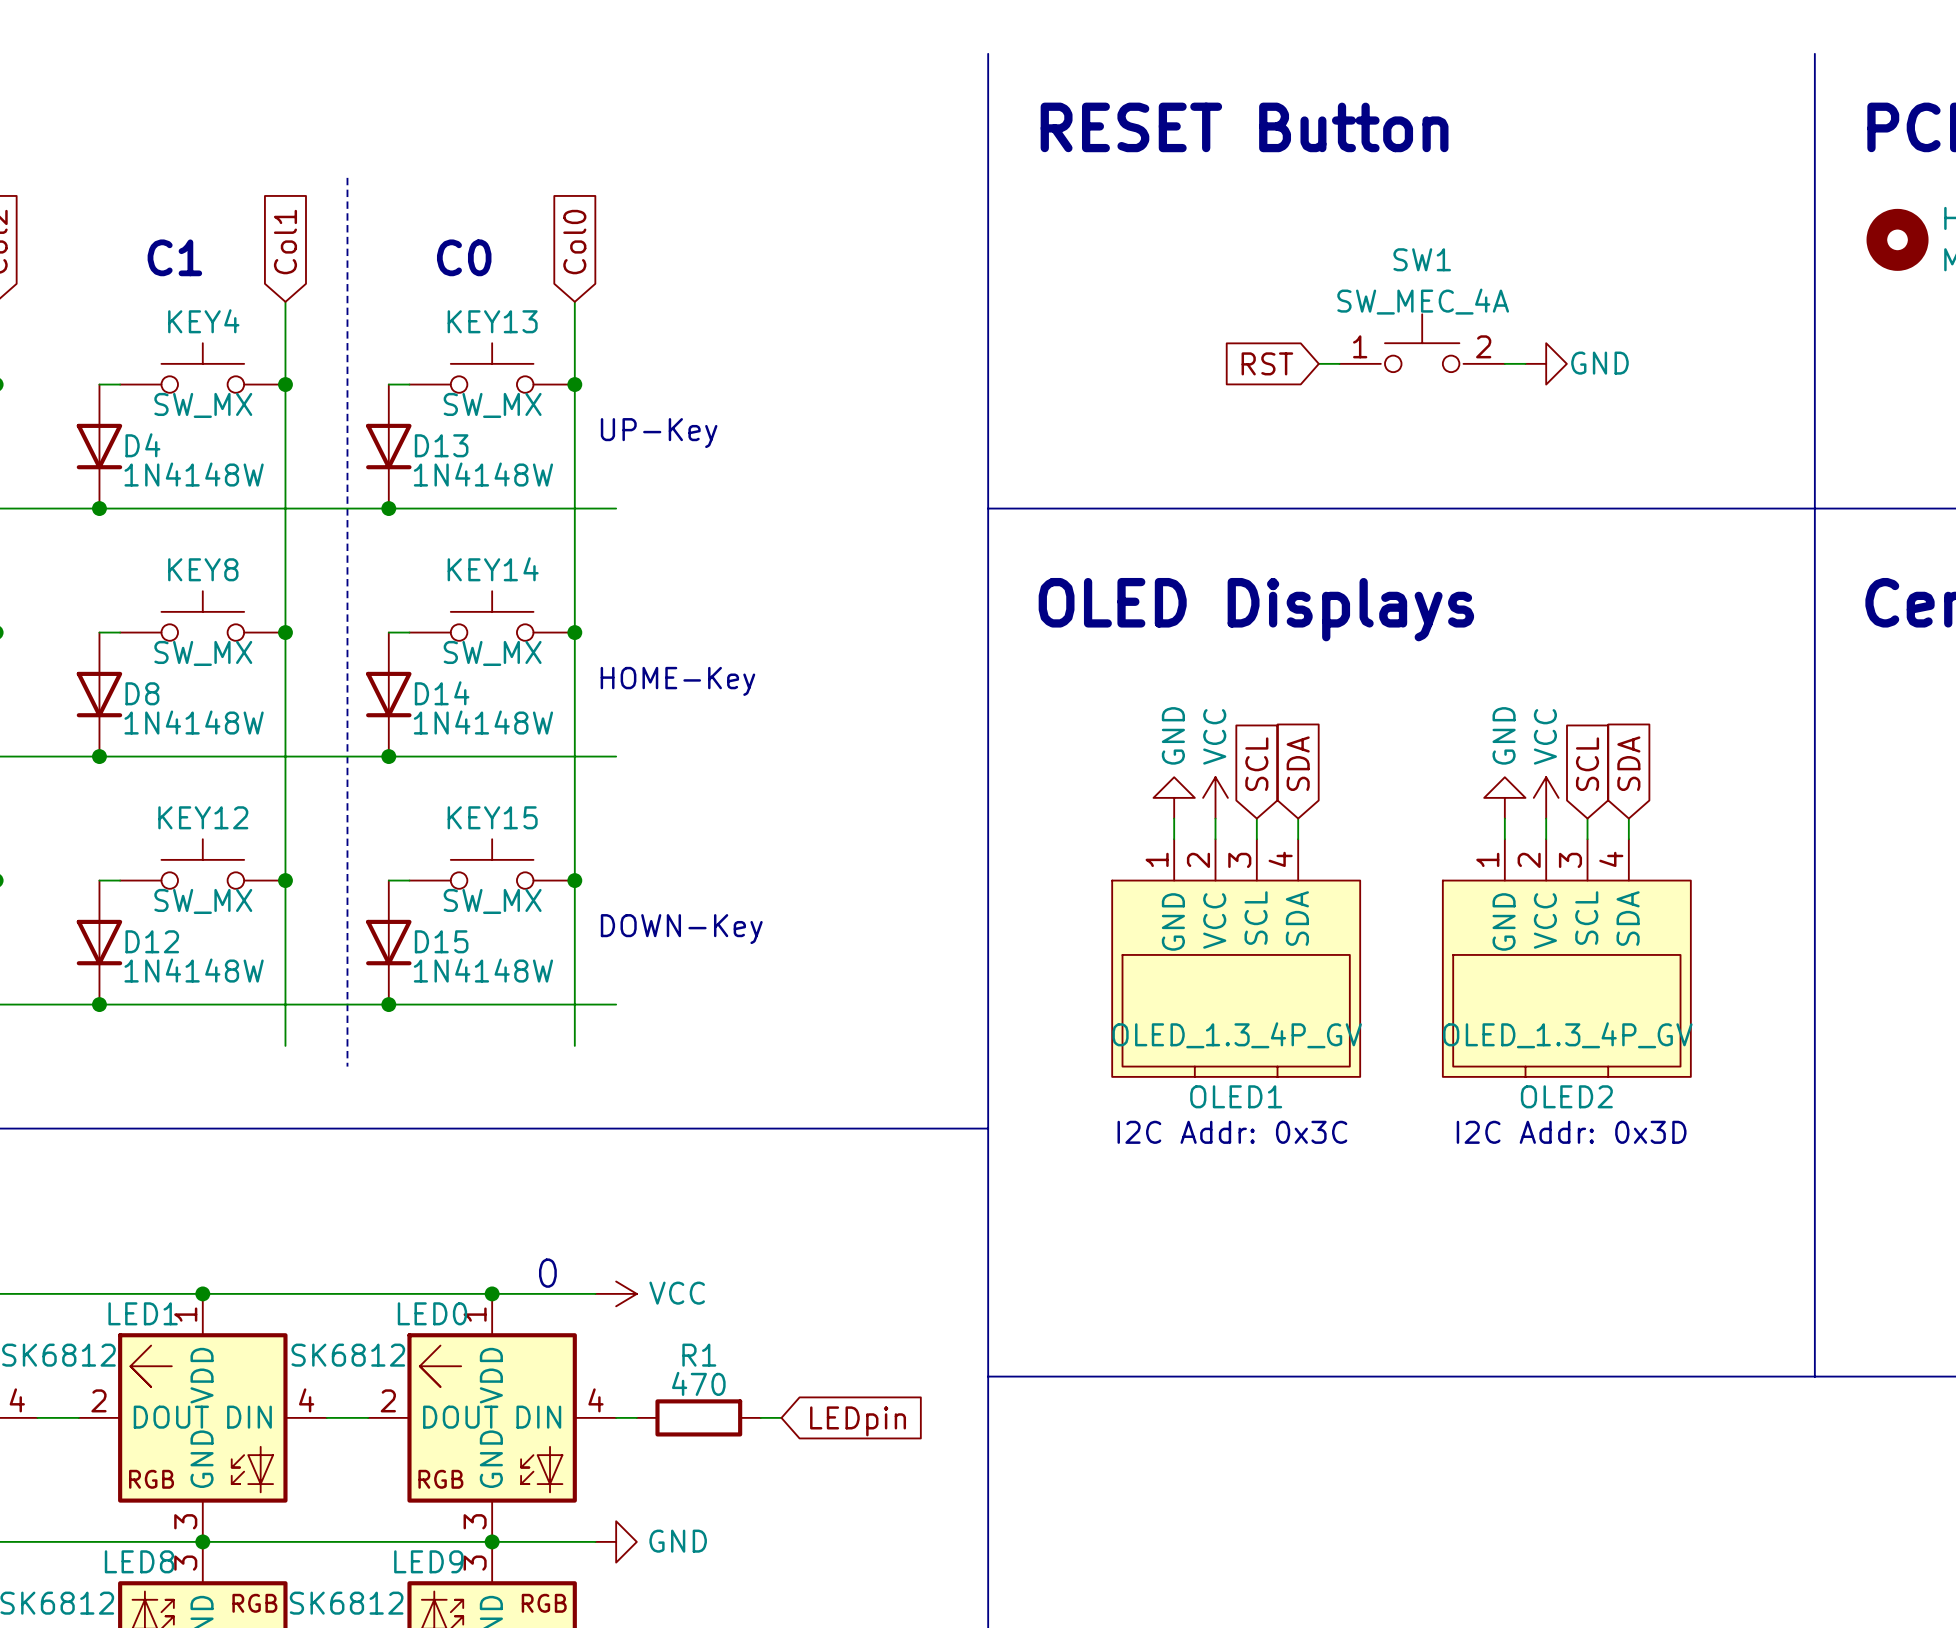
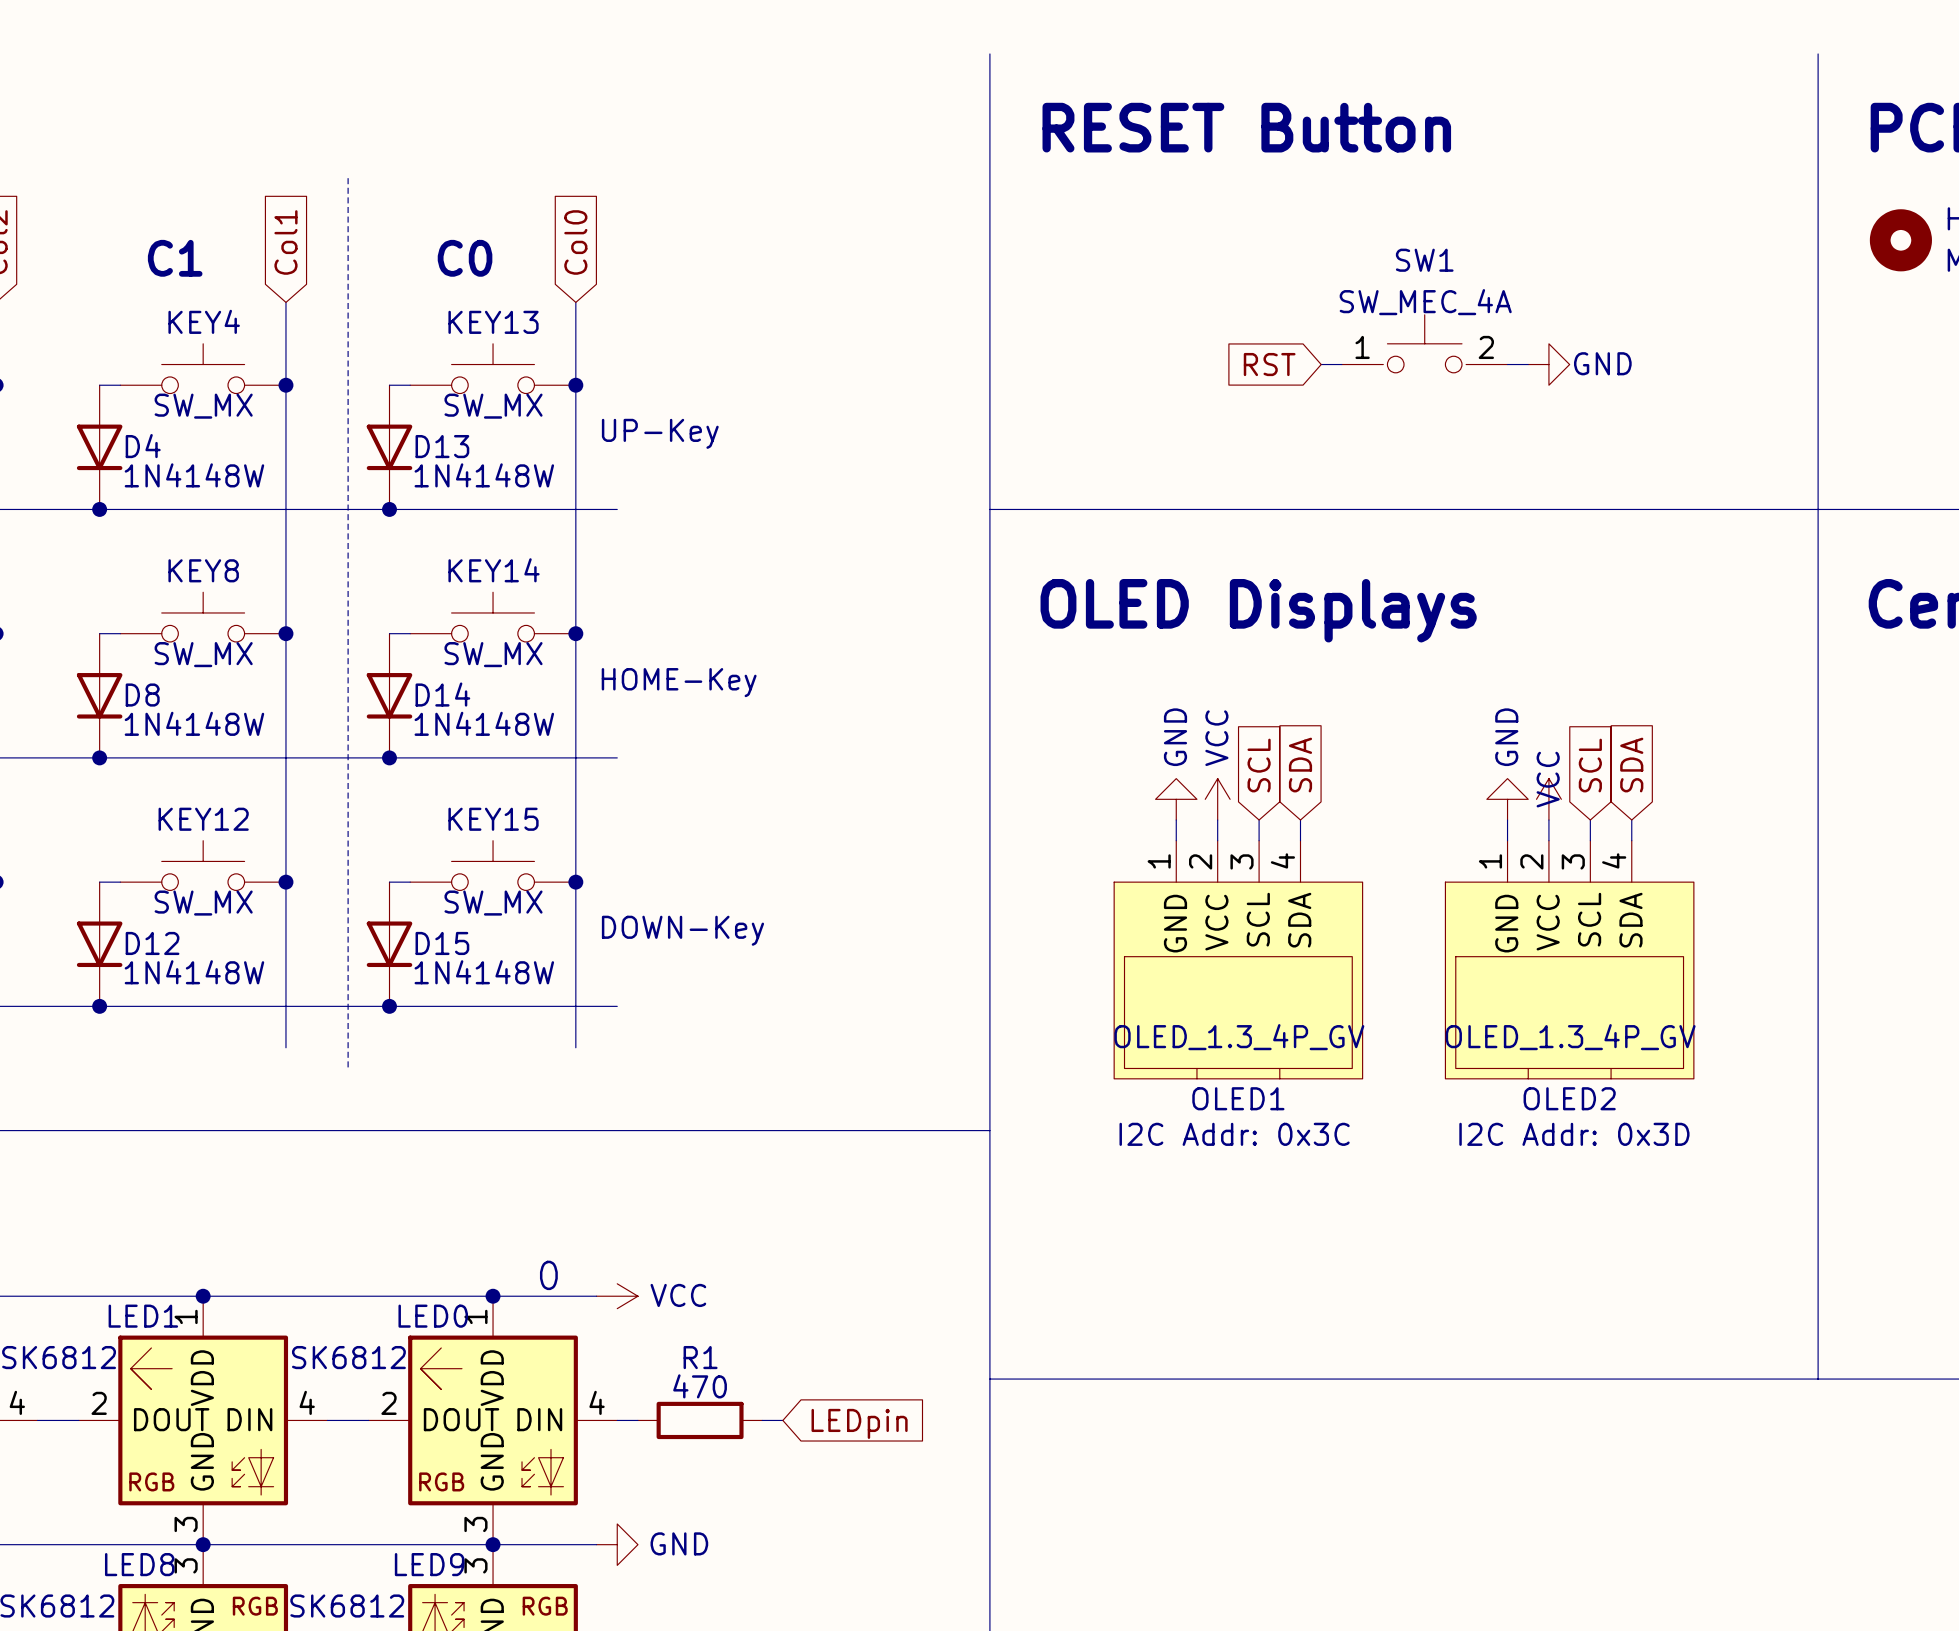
power symbol text position: VCC (1545, 736) -> VCC (1548, 779)

